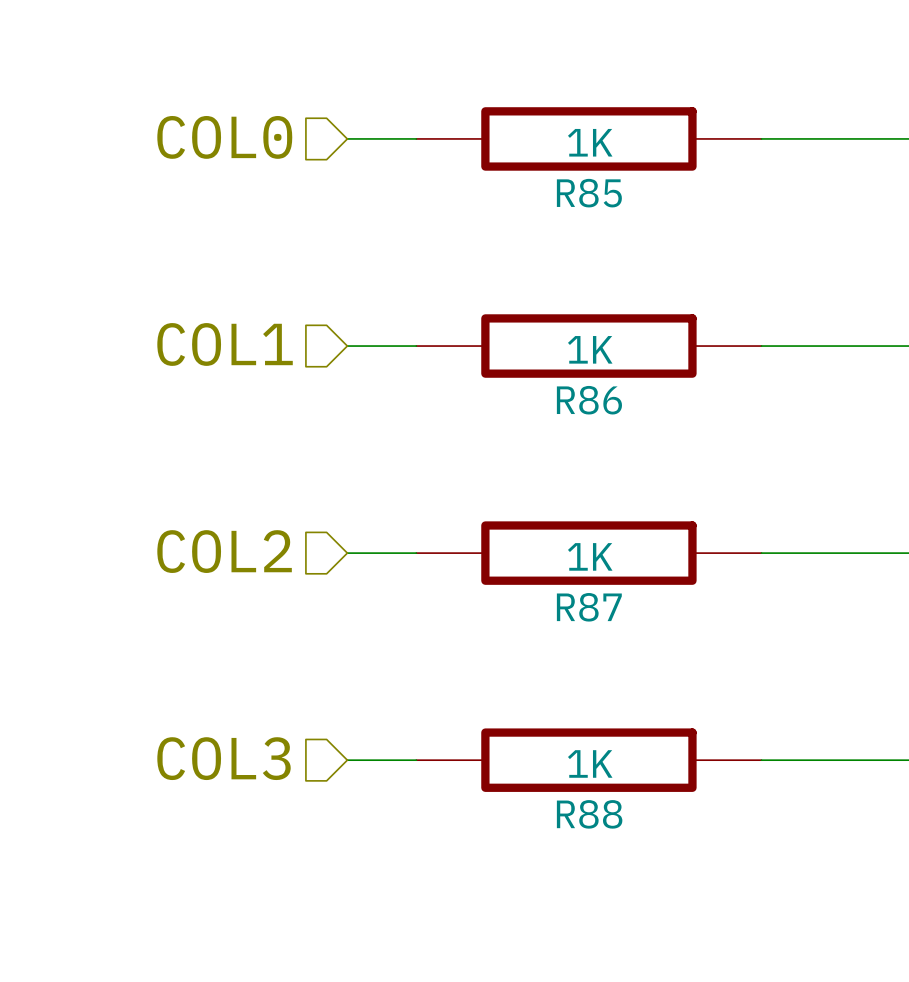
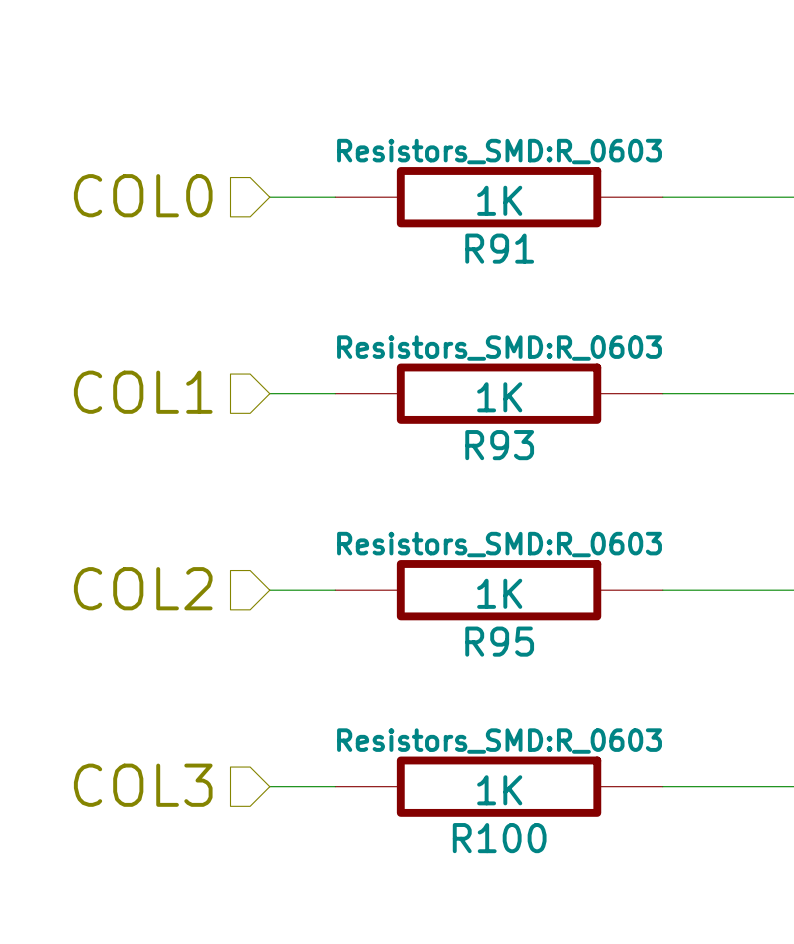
R85 text: none -> Resistors_SMD:R_0603 (499, 151)
R85 name: R85 (589, 193) -> R91 (499, 248)
R86 text: none -> Resistors_SMD:R_0603 (499, 348)
R86 name: R86 (589, 400) -> R93 (499, 445)
R87 text: none -> Resistors_SMD:R_0603 (499, 544)
R87 name: R87 (589, 607) -> R95 (499, 641)
R88 text: none -> Resistors_SMD:R_0603 (499, 741)
R88 name: R88 (589, 814) -> R100 (499, 838)

